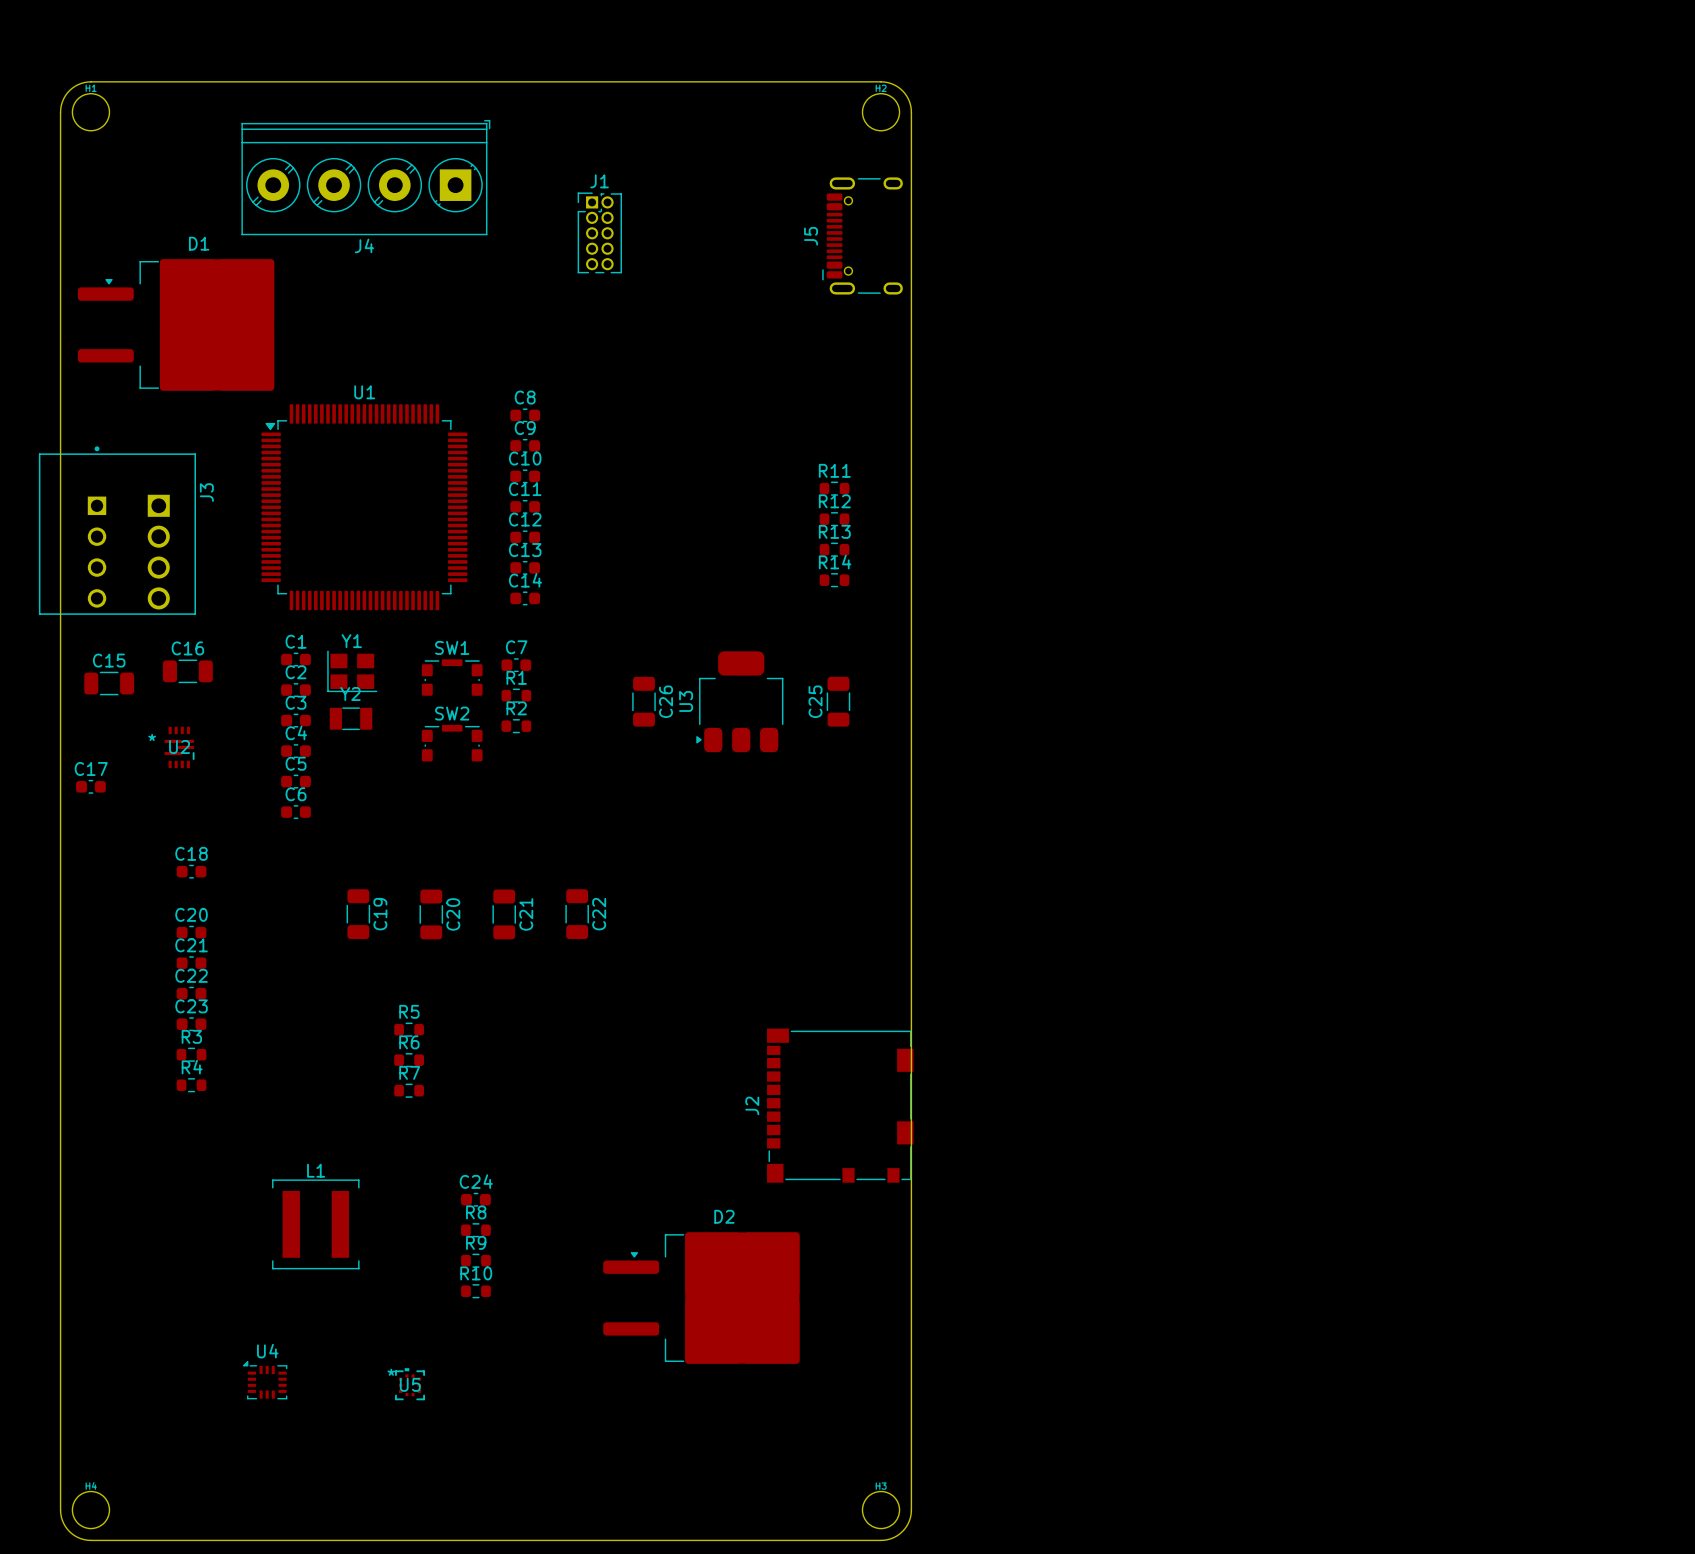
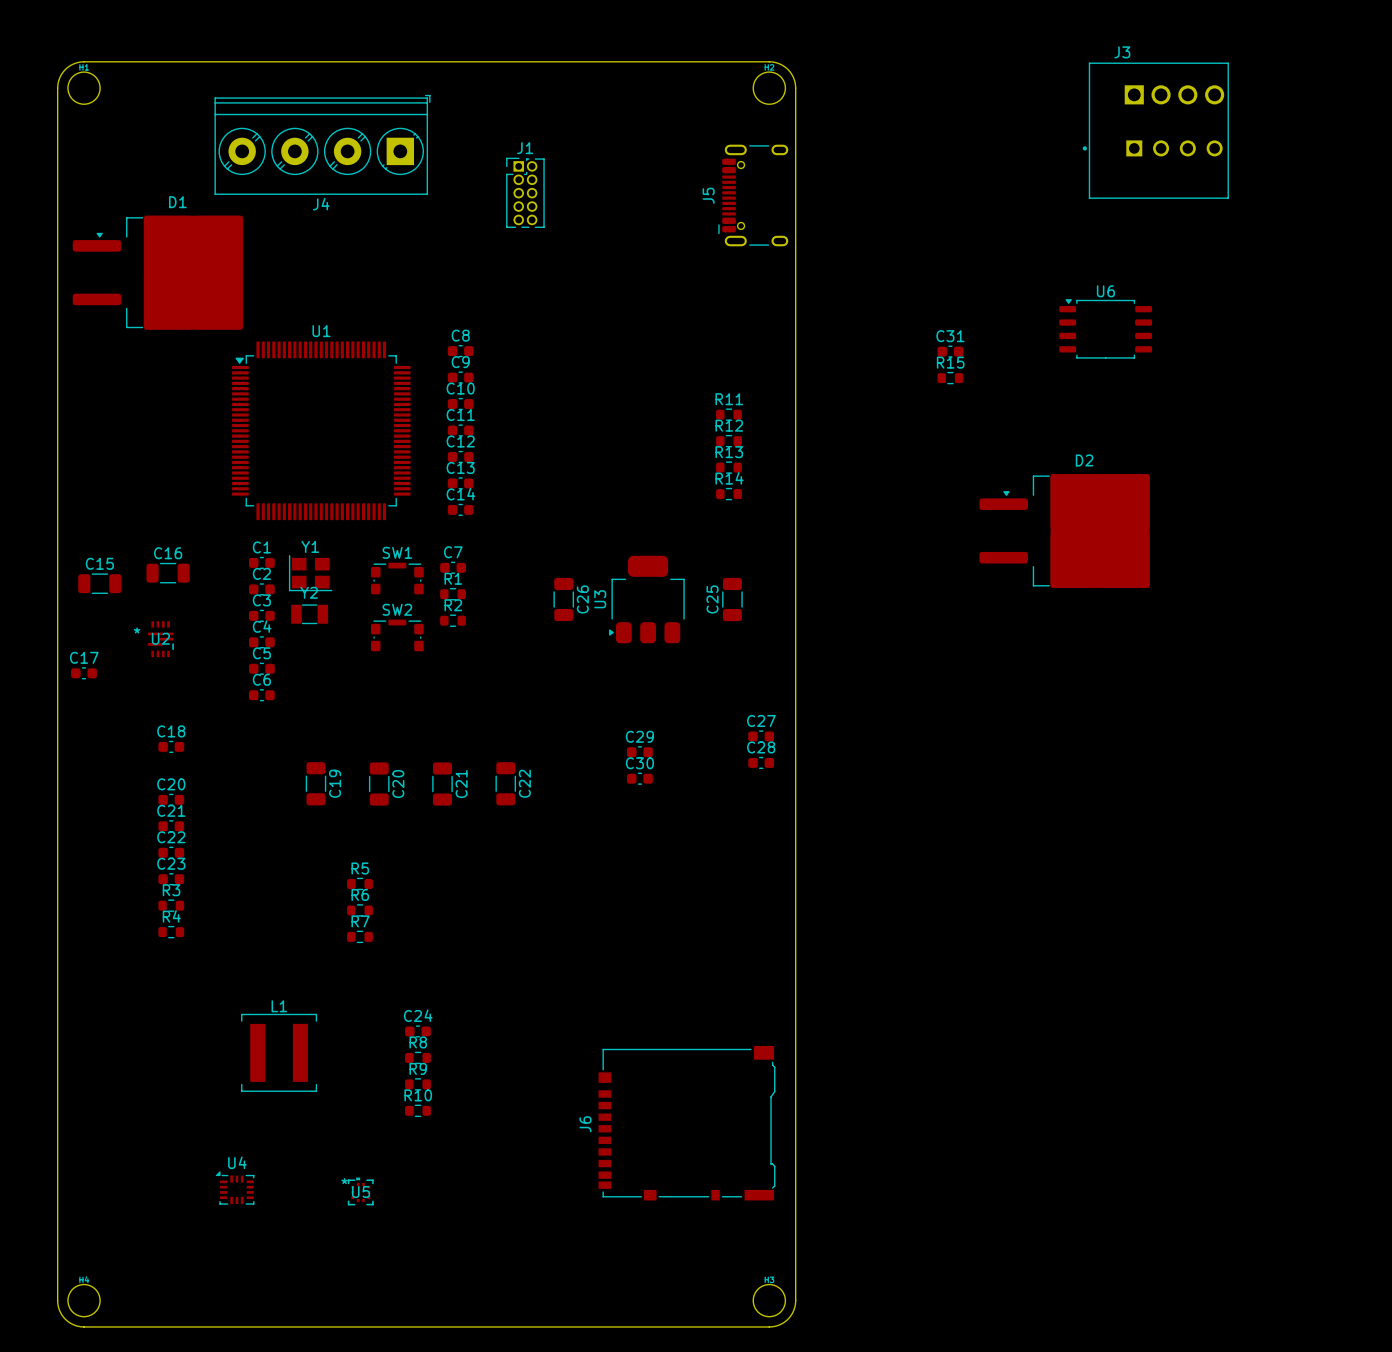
U6: none -> (1105, 328)
C31: none -> (950, 351)
R15: none -> (950, 378)
J3 rotation: 0° (117, 530) -> 90° counterclockwise (1155, 130)
J3 position: (117, 530) -> (1155, 130)
C27: none -> (761, 736)
C29: none -> (639, 752)
C28: none -> (761, 762)
C30: none -> (639, 778)
J2: (840, 1105) -> none
D2 position: (701, 1298) -> (1064, 530)
J6: none -> (686, 1123)

